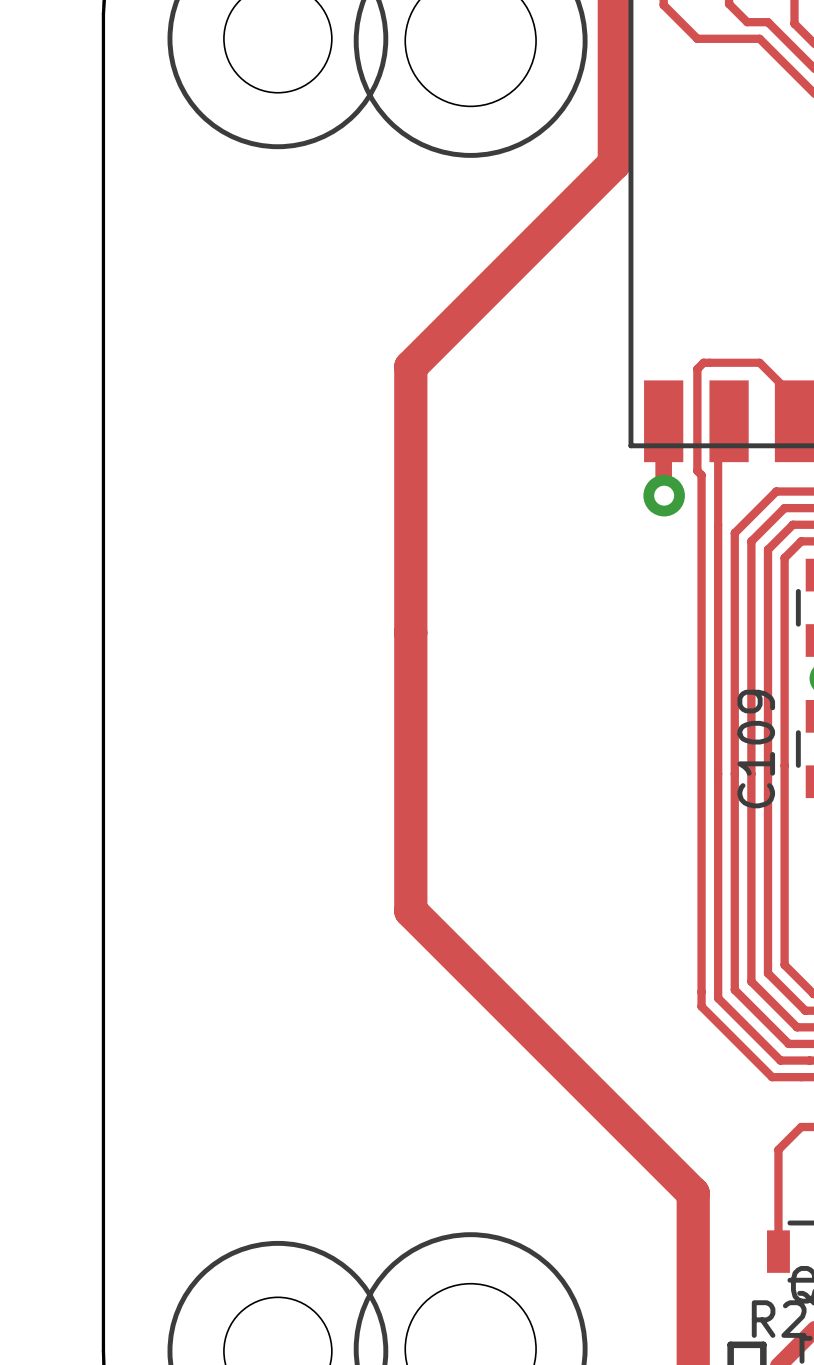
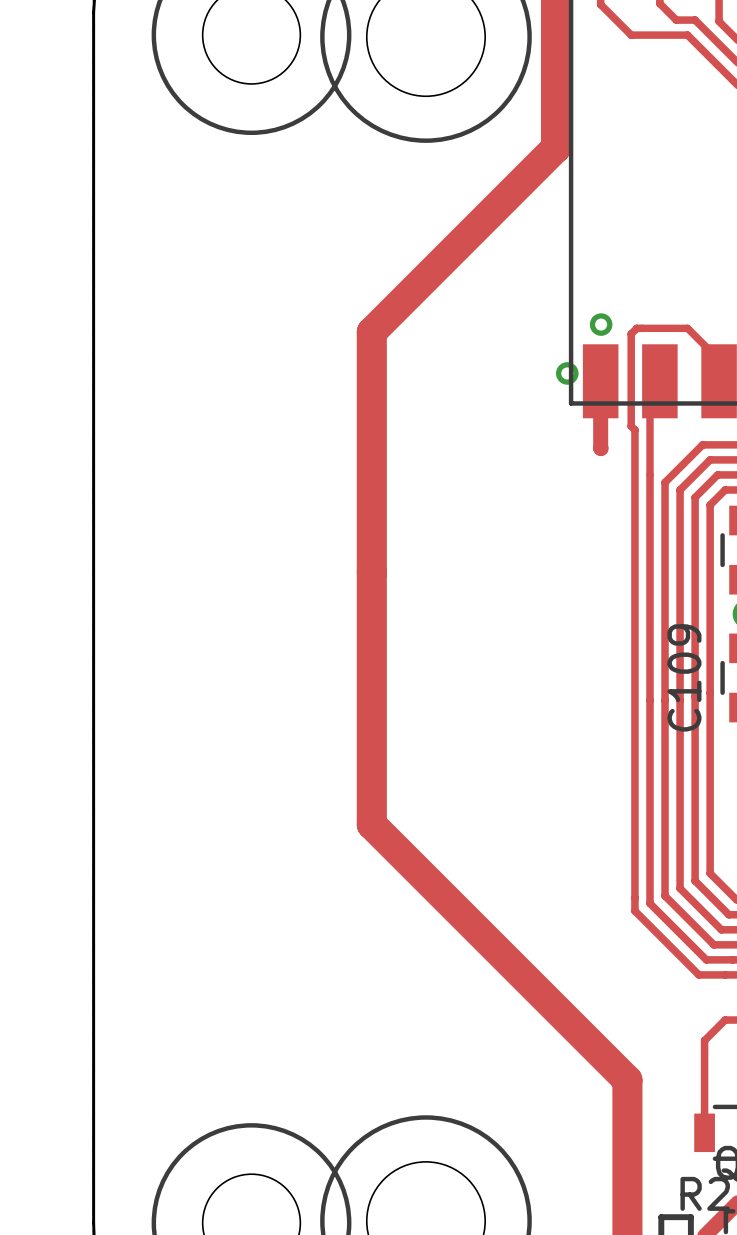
via: none -> (601, 324)
via: none -> (567, 373)
via: (664, 495) -> none

